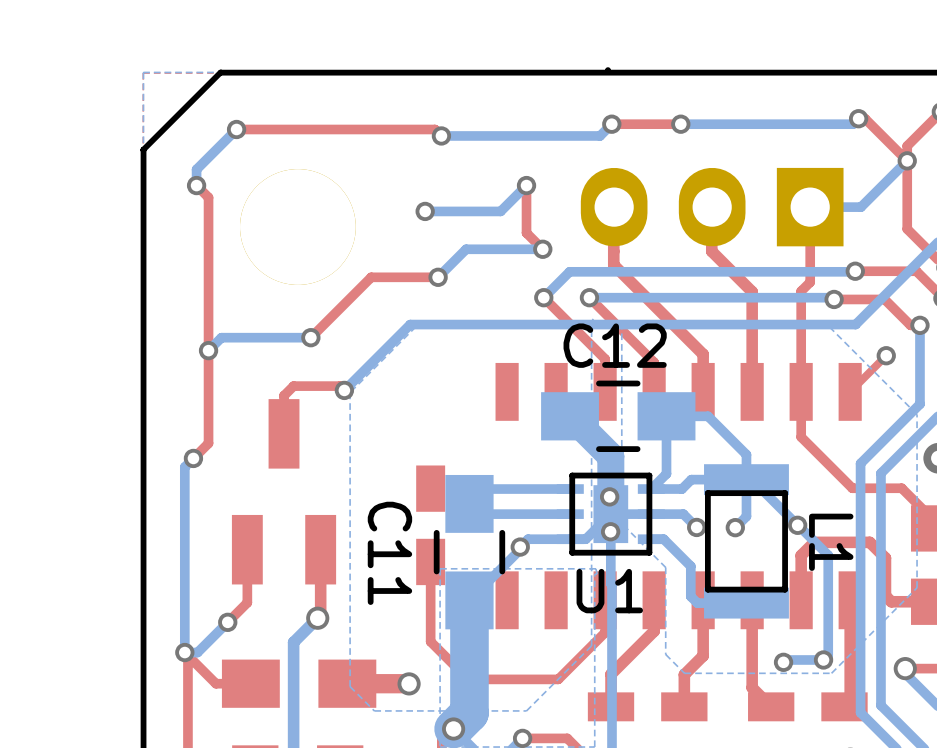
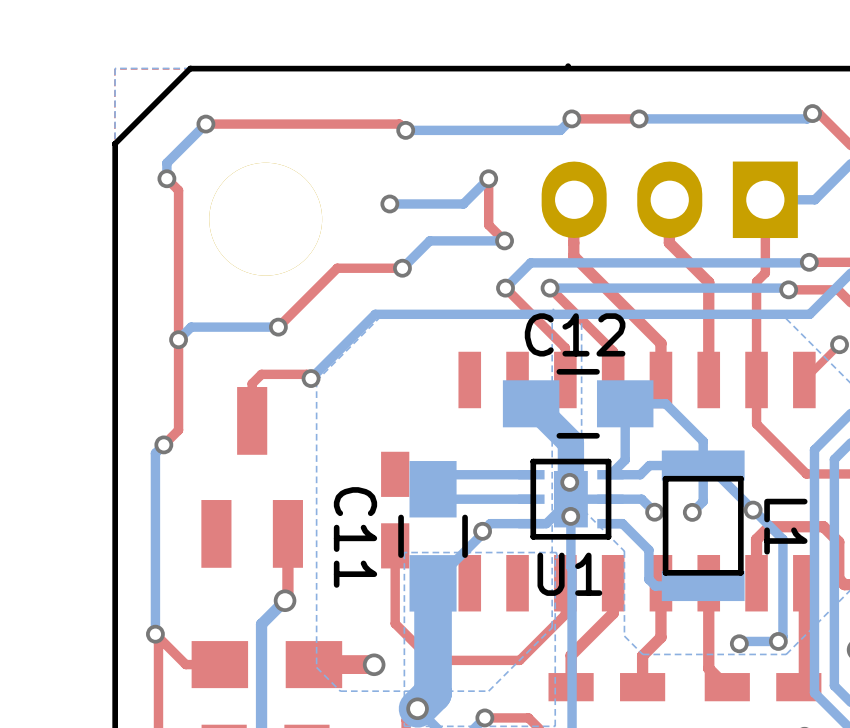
top track: (247, 549) (247, 602) (227, 622) -> none
bottom track: (227, 622) (197, 652) (184, 652) -> none
via: (227, 622) -> none

